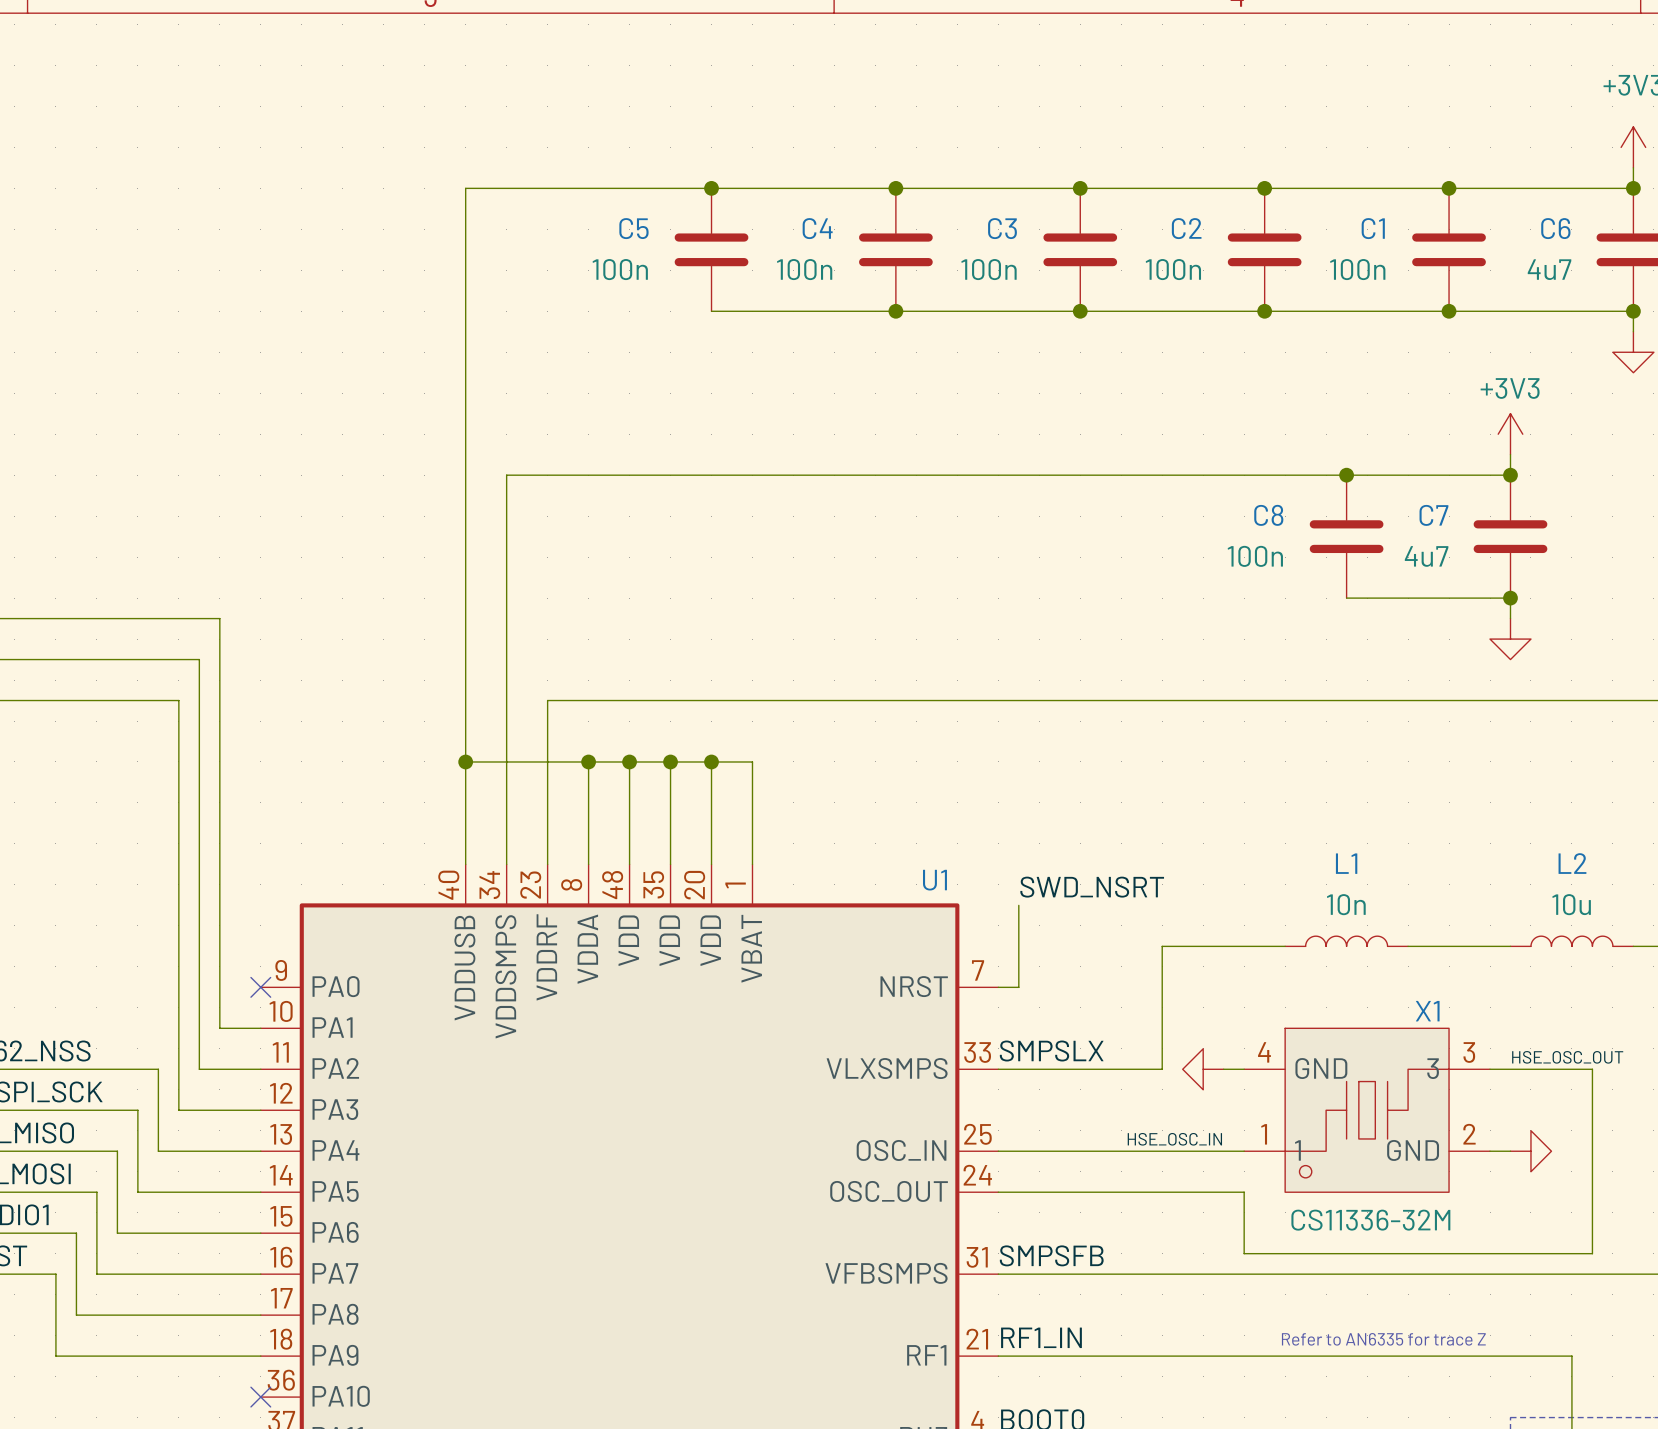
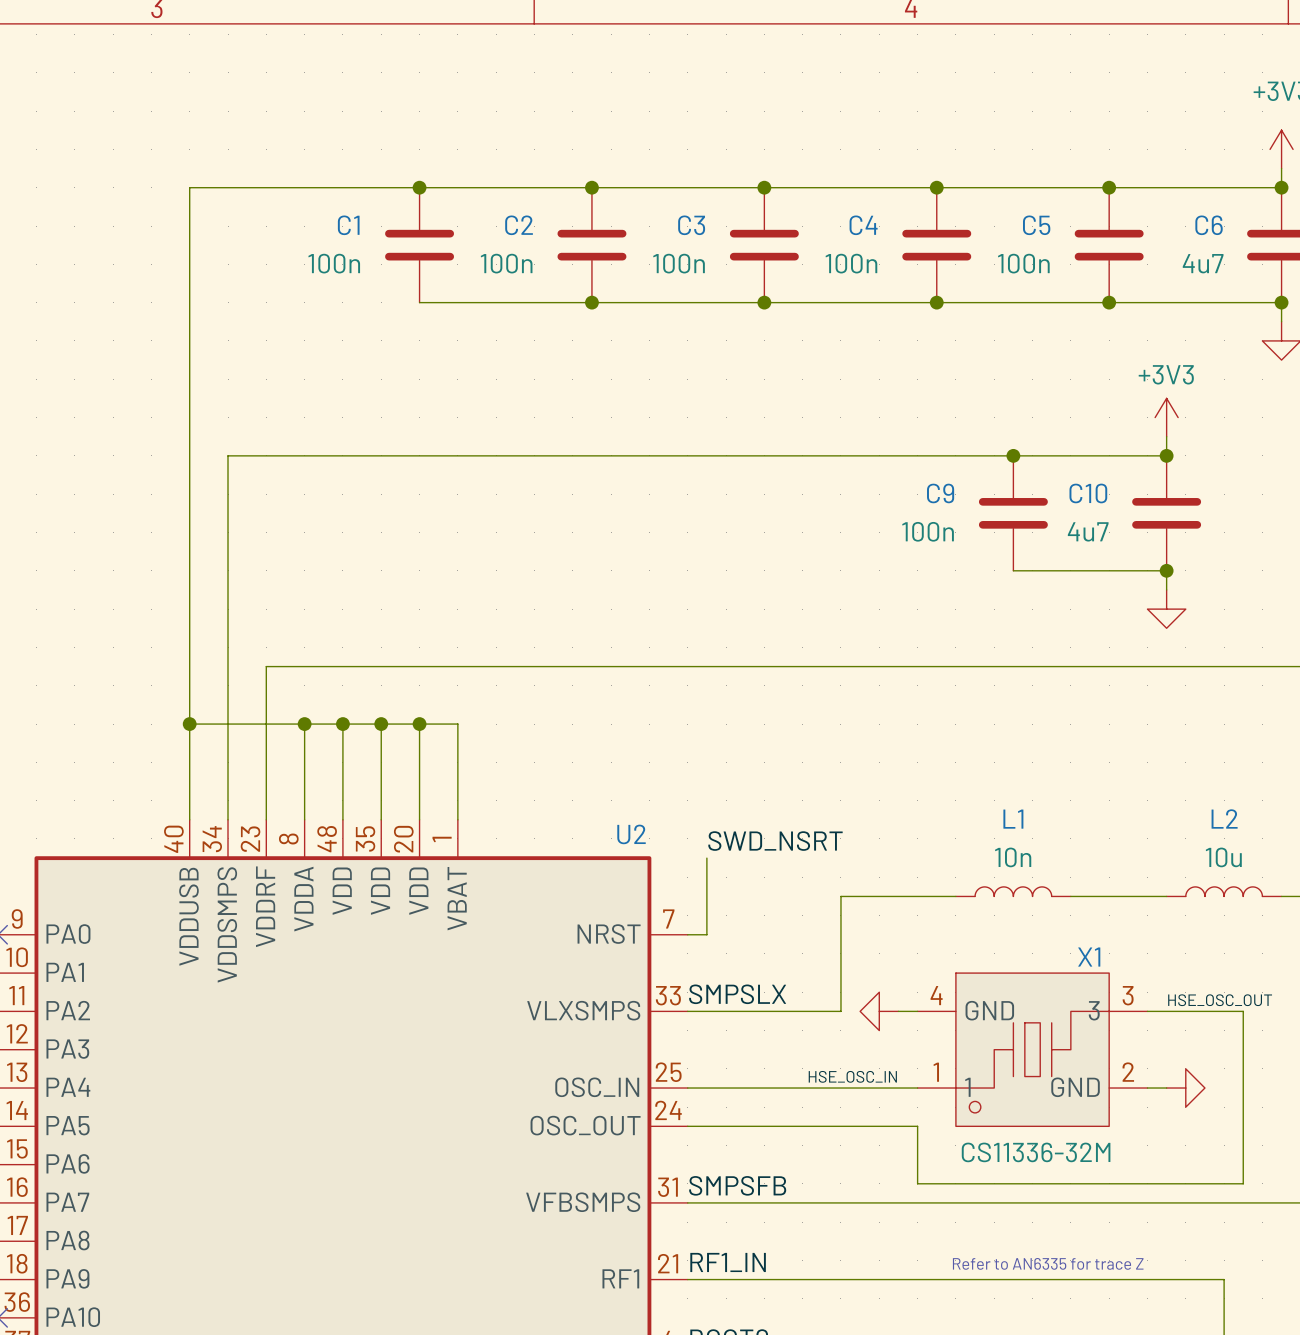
C5 name: C5 (633, 228) -> C1 (348, 225)
C4 name: C4 (817, 228) -> C2 (519, 225)
C2 name: C2 (1186, 228) -> C4 (863, 225)
C1 name: C1 (1373, 228) -> C5 (1036, 225)
C8 name: C8 (1268, 515) -> C9 (940, 493)
C7 name: C7 (1433, 515) -> C10 (1088, 493)
U1 name: U1 (934, 880) -> U2 (631, 834)

